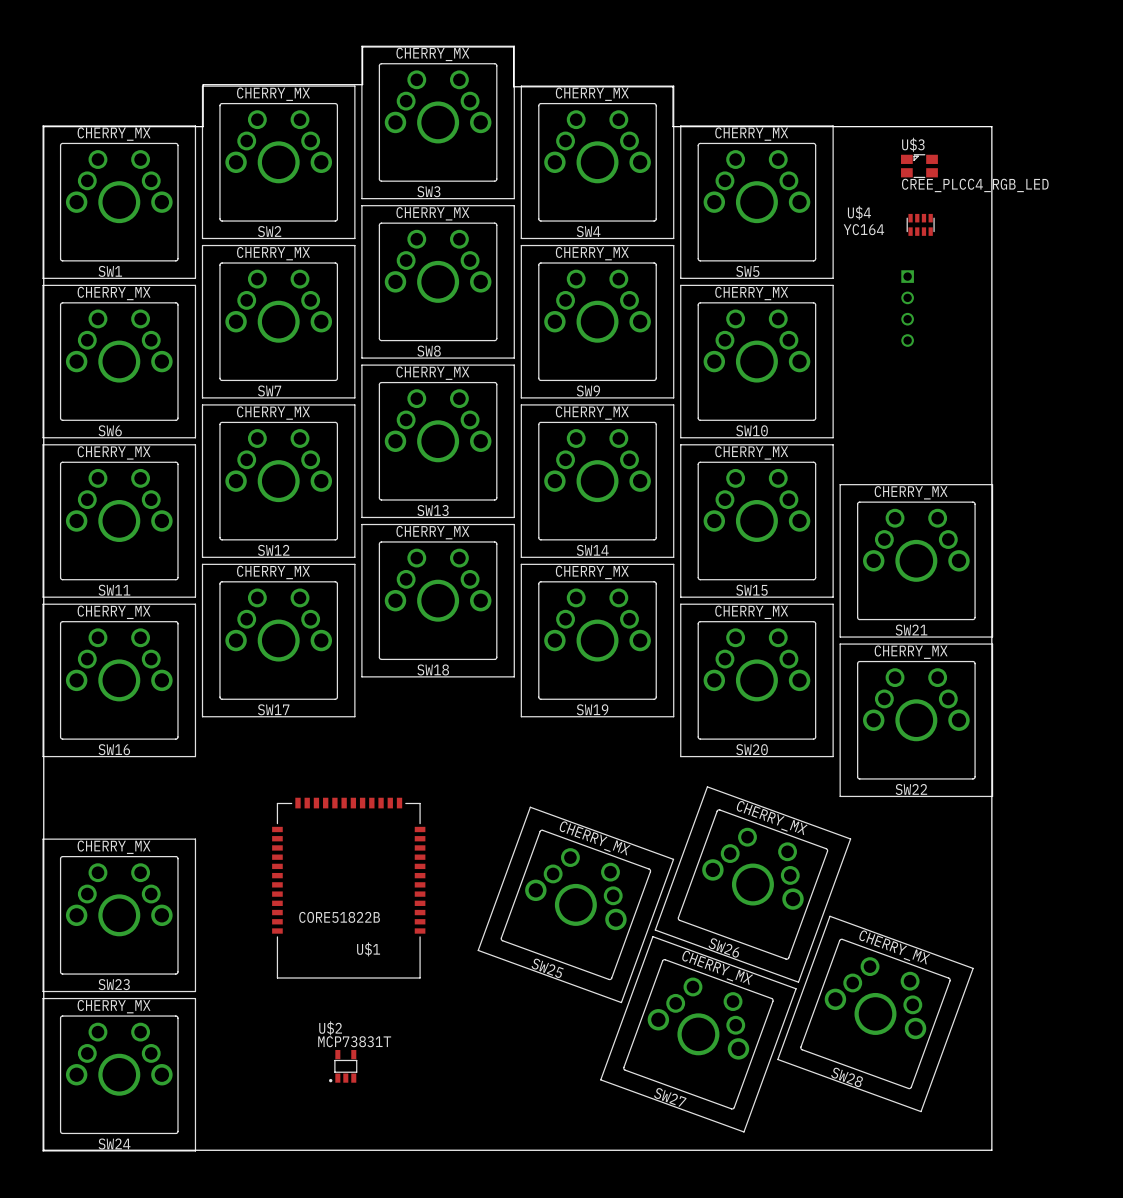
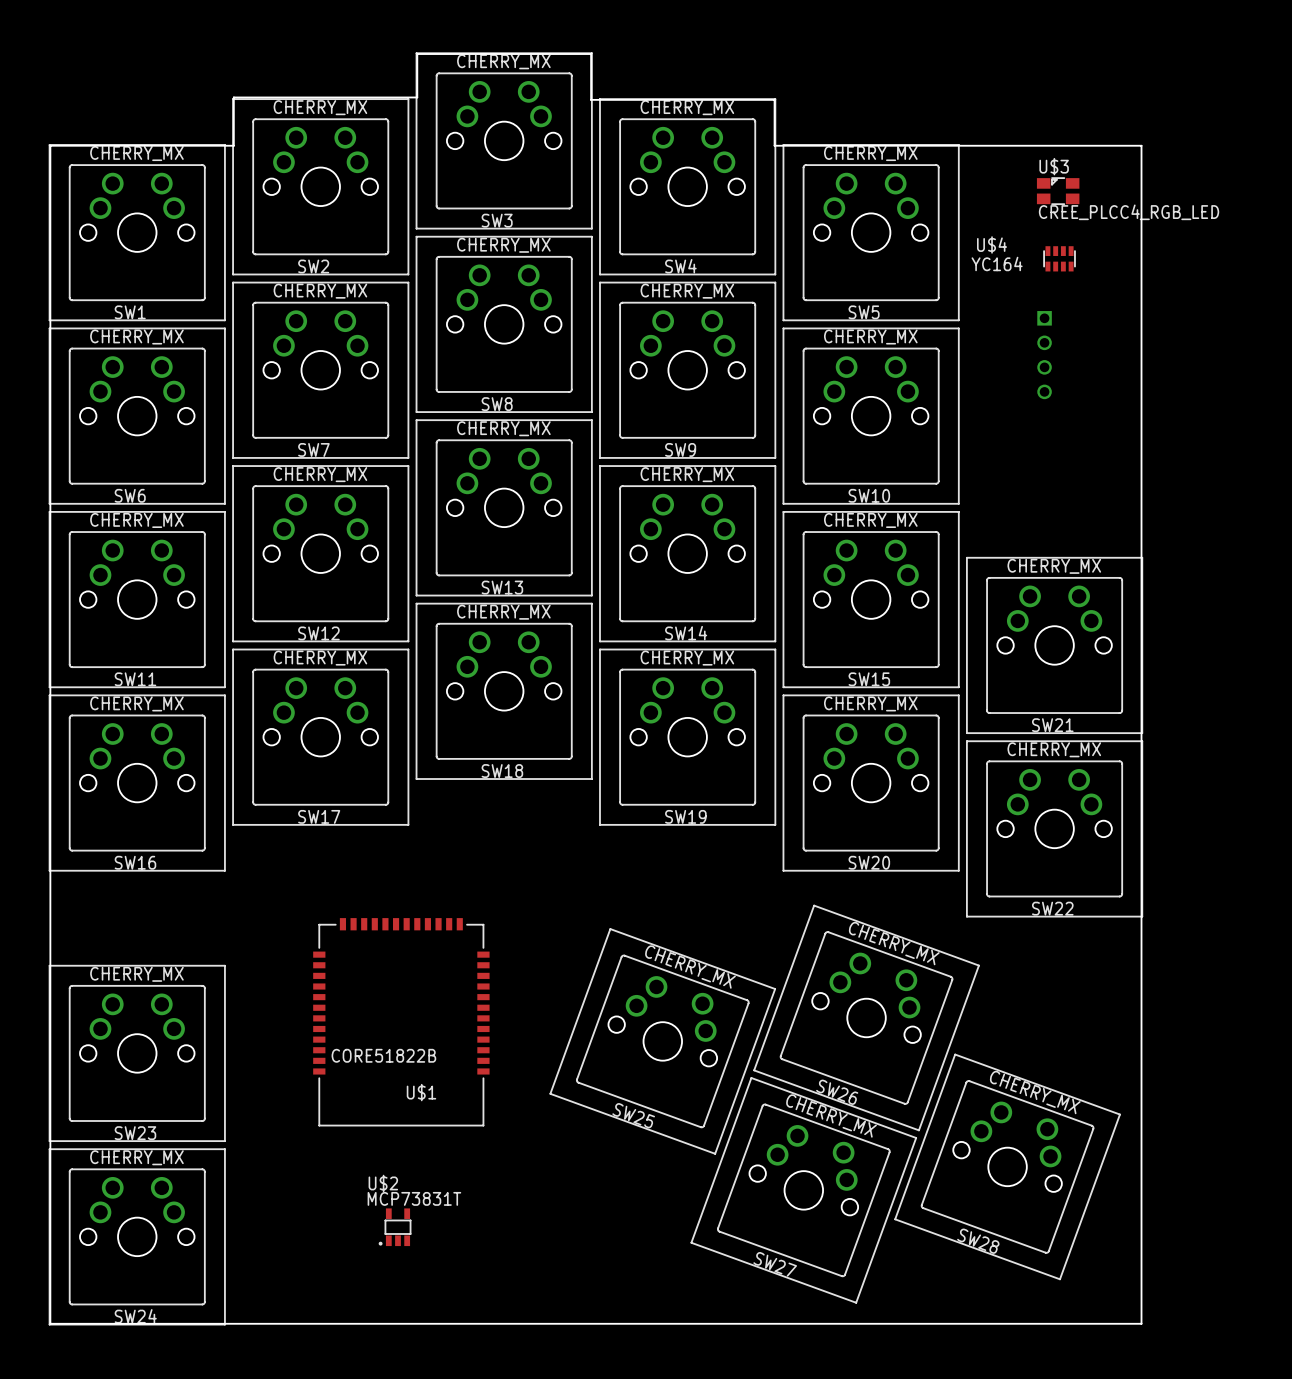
SW3 footprint: [361, 45, 515, 200] -> [415, 52, 593, 230]
SW2 footprint: [201, 85, 356, 240] -> [232, 98, 410, 276]
SW4 footprint: [520, 85, 675, 240] -> [599, 98, 776, 276]
SW1 footprint: [42, 125, 197, 279] -> [48, 144, 226, 321]
SW5 footprint: [680, 125, 834, 279] -> [782, 144, 960, 321]
SW8 footprint: [361, 205, 515, 359] -> [415, 236, 593, 413]
SW7 footprint: [201, 244, 356, 399] -> [232, 281, 410, 459]
SW9 footprint: [520, 244, 675, 399] -> [599, 281, 776, 459]
SW6 footprint: [42, 284, 197, 439] -> [48, 327, 226, 505]
SW10 footprint: [680, 284, 834, 439] -> [782, 327, 960, 505]
SW13 footprint: [361, 364, 515, 519] -> [415, 419, 593, 597]
SW12 footprint: [201, 404, 356, 558] -> [232, 465, 410, 643]
SW14 footprint: [520, 404, 675, 558] -> [599, 465, 776, 643]
SW11 footprint: [42, 444, 197, 598] -> [48, 511, 226, 688]
SW15 footprint: [680, 444, 834, 598] -> [782, 511, 960, 688]
SW21 footprint: [839, 484, 994, 638] -> [966, 557, 1143, 734]
SW18 footprint: [361, 523, 515, 678] -> [415, 603, 593, 780]
SW17 footprint: [201, 563, 356, 718] -> [232, 648, 410, 826]
SW19 footprint: [520, 563, 675, 718] -> [599, 648, 776, 826]
SW16 footprint: [42, 603, 197, 758] -> [48, 694, 226, 872]
SW20 footprint: [680, 603, 834, 758] -> [782, 694, 960, 872]
SW22 footprint: [839, 643, 994, 797] -> [966, 740, 1143, 918]
SW26 footprint: [654, 786, 852, 983] -> [753, 904, 980, 1131]
SW25 footprint: [477, 806, 675, 1004] -> [549, 928, 776, 1155]
SW23 footprint: [42, 838, 197, 993] -> [48, 965, 226, 1142]
SW28 footprint: [777, 915, 974, 1113] -> [894, 1053, 1121, 1280]
SW27 footprint: [600, 936, 797, 1133] -> [690, 1077, 917, 1304]
SW24 footprint: [42, 998, 197, 1152] -> [48, 1148, 226, 1326]

